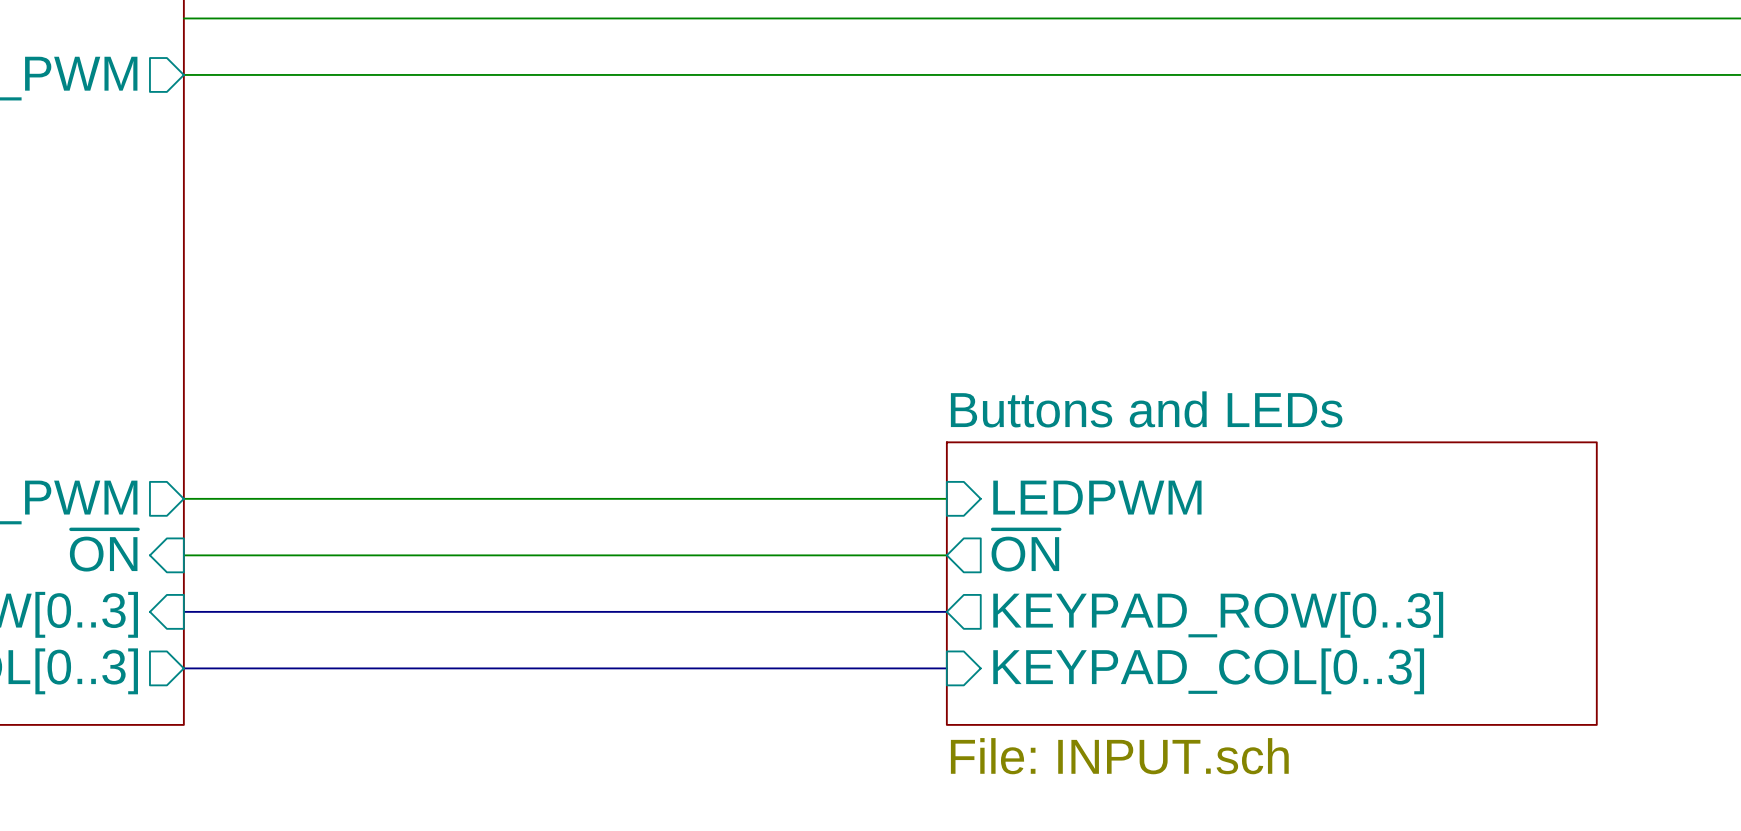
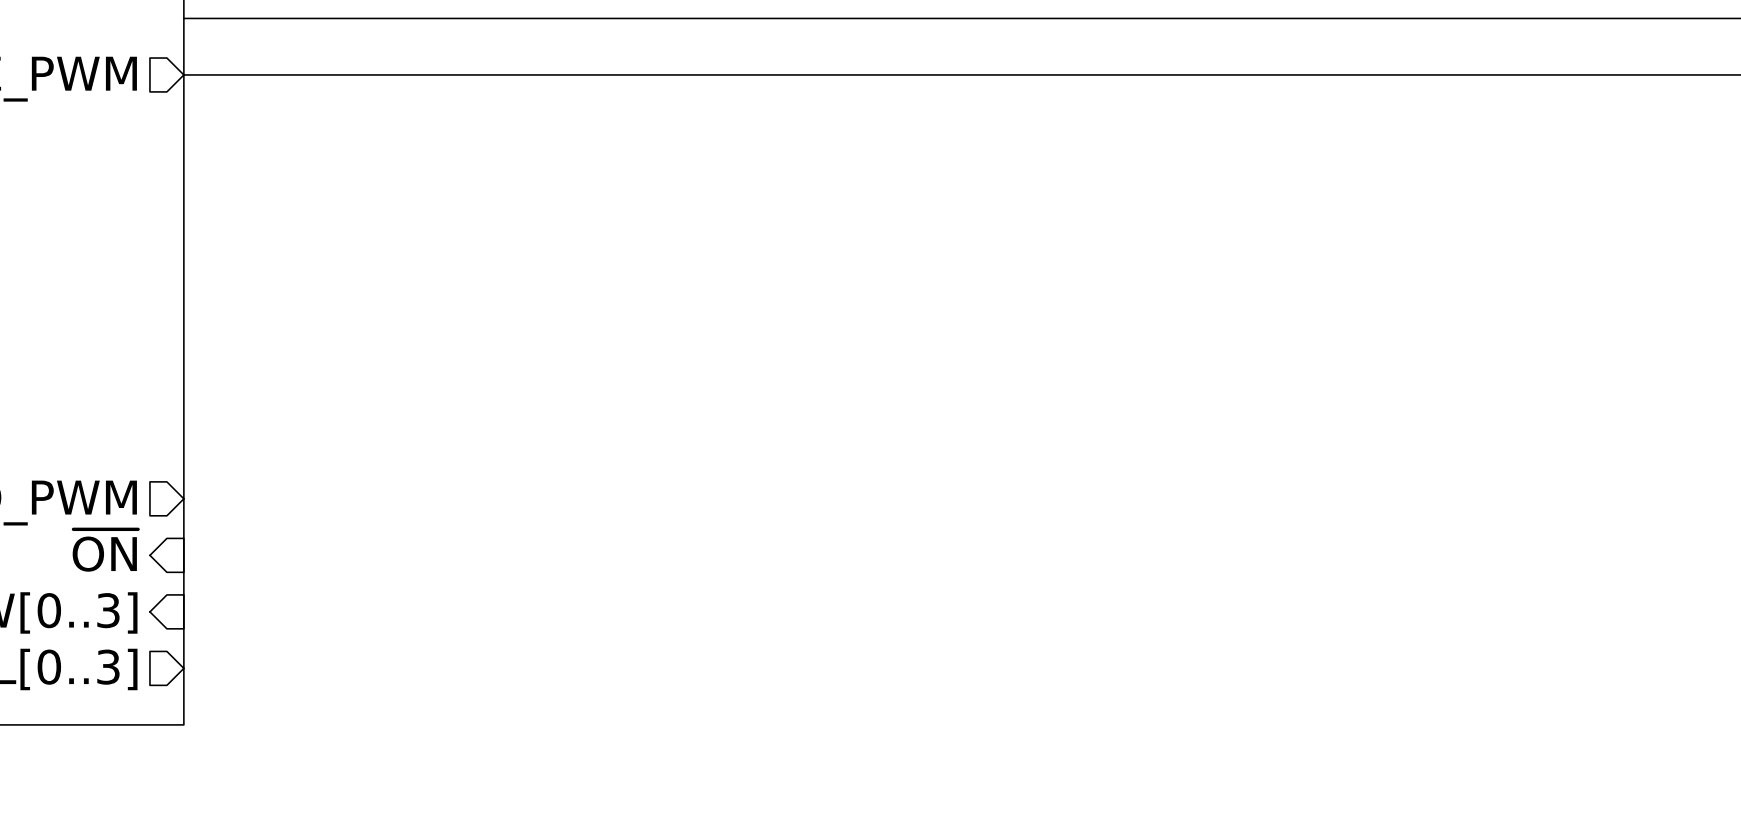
sheet pin: LEDPWM (1097, 497) -> none
wire: (183, 498) (946, 498) -> none
sheet pin: ~{ON} (1025, 550) -> none
wire: (183, 555) (946, 555) -> none
sheet Buttons and LEDs: File: INPUT.sch (1271, 583) -> none
bus: (183, 611) (946, 611) -> none
sheet pin: KEYPAD_ROW[0..3] (1218, 614) -> none
bus: (183, 668) (946, 668) -> none
sheet pin: KEYPAD_COL[0..3] (1208, 671) -> none

